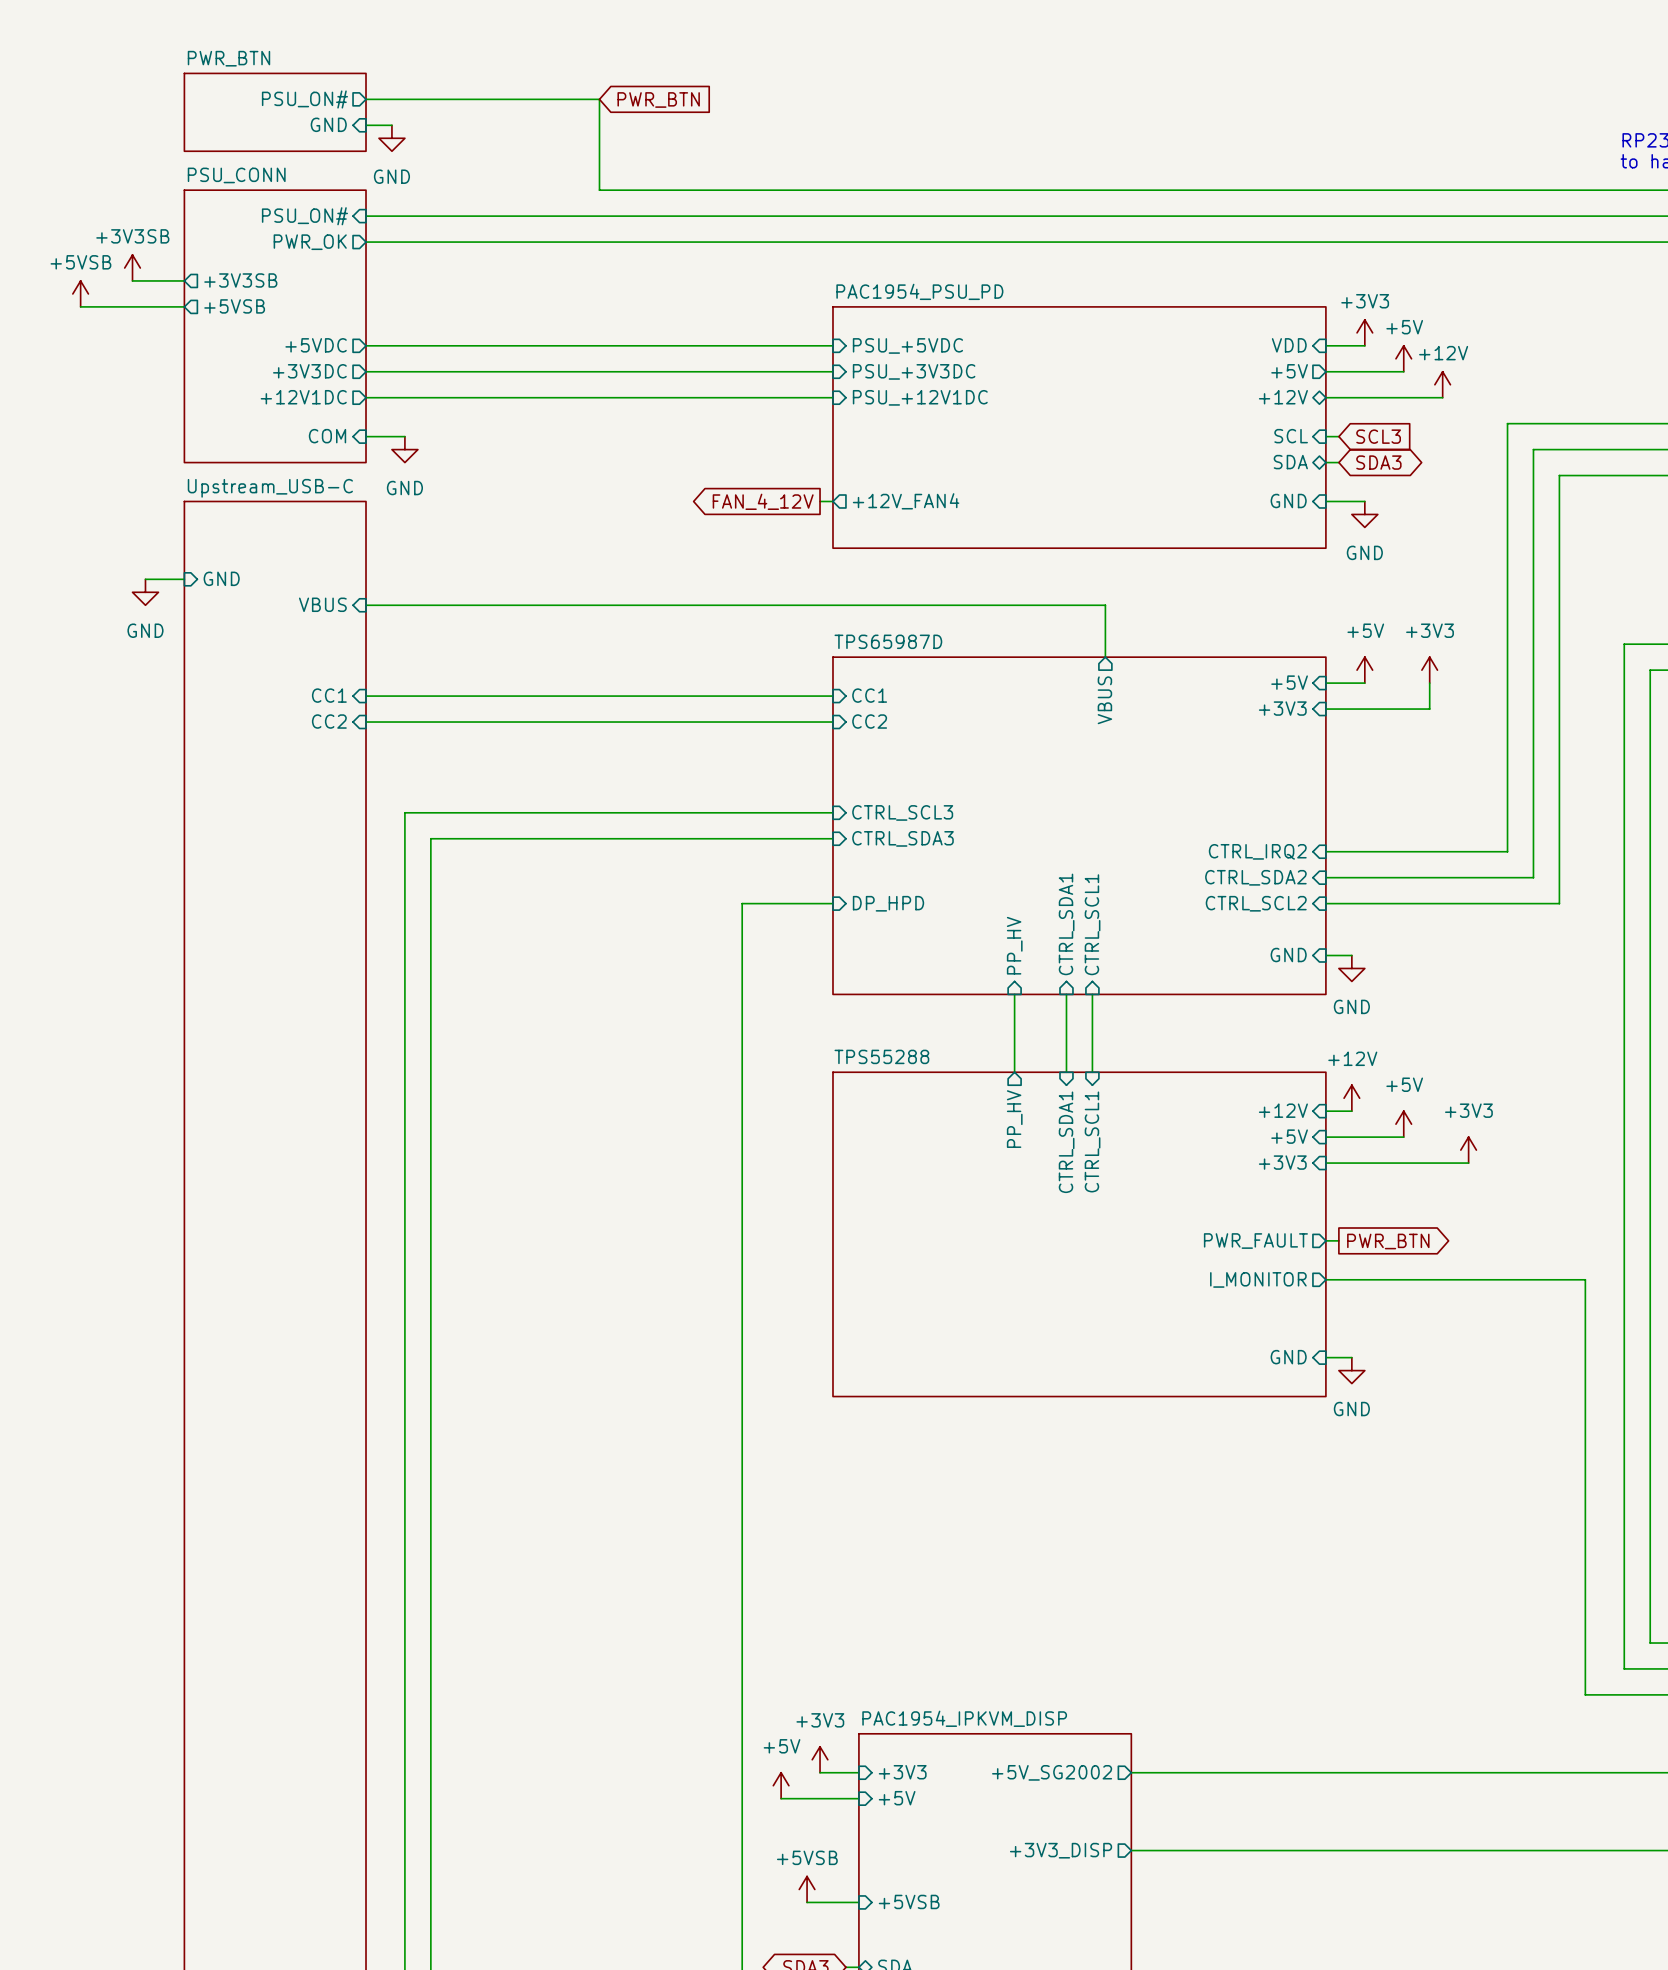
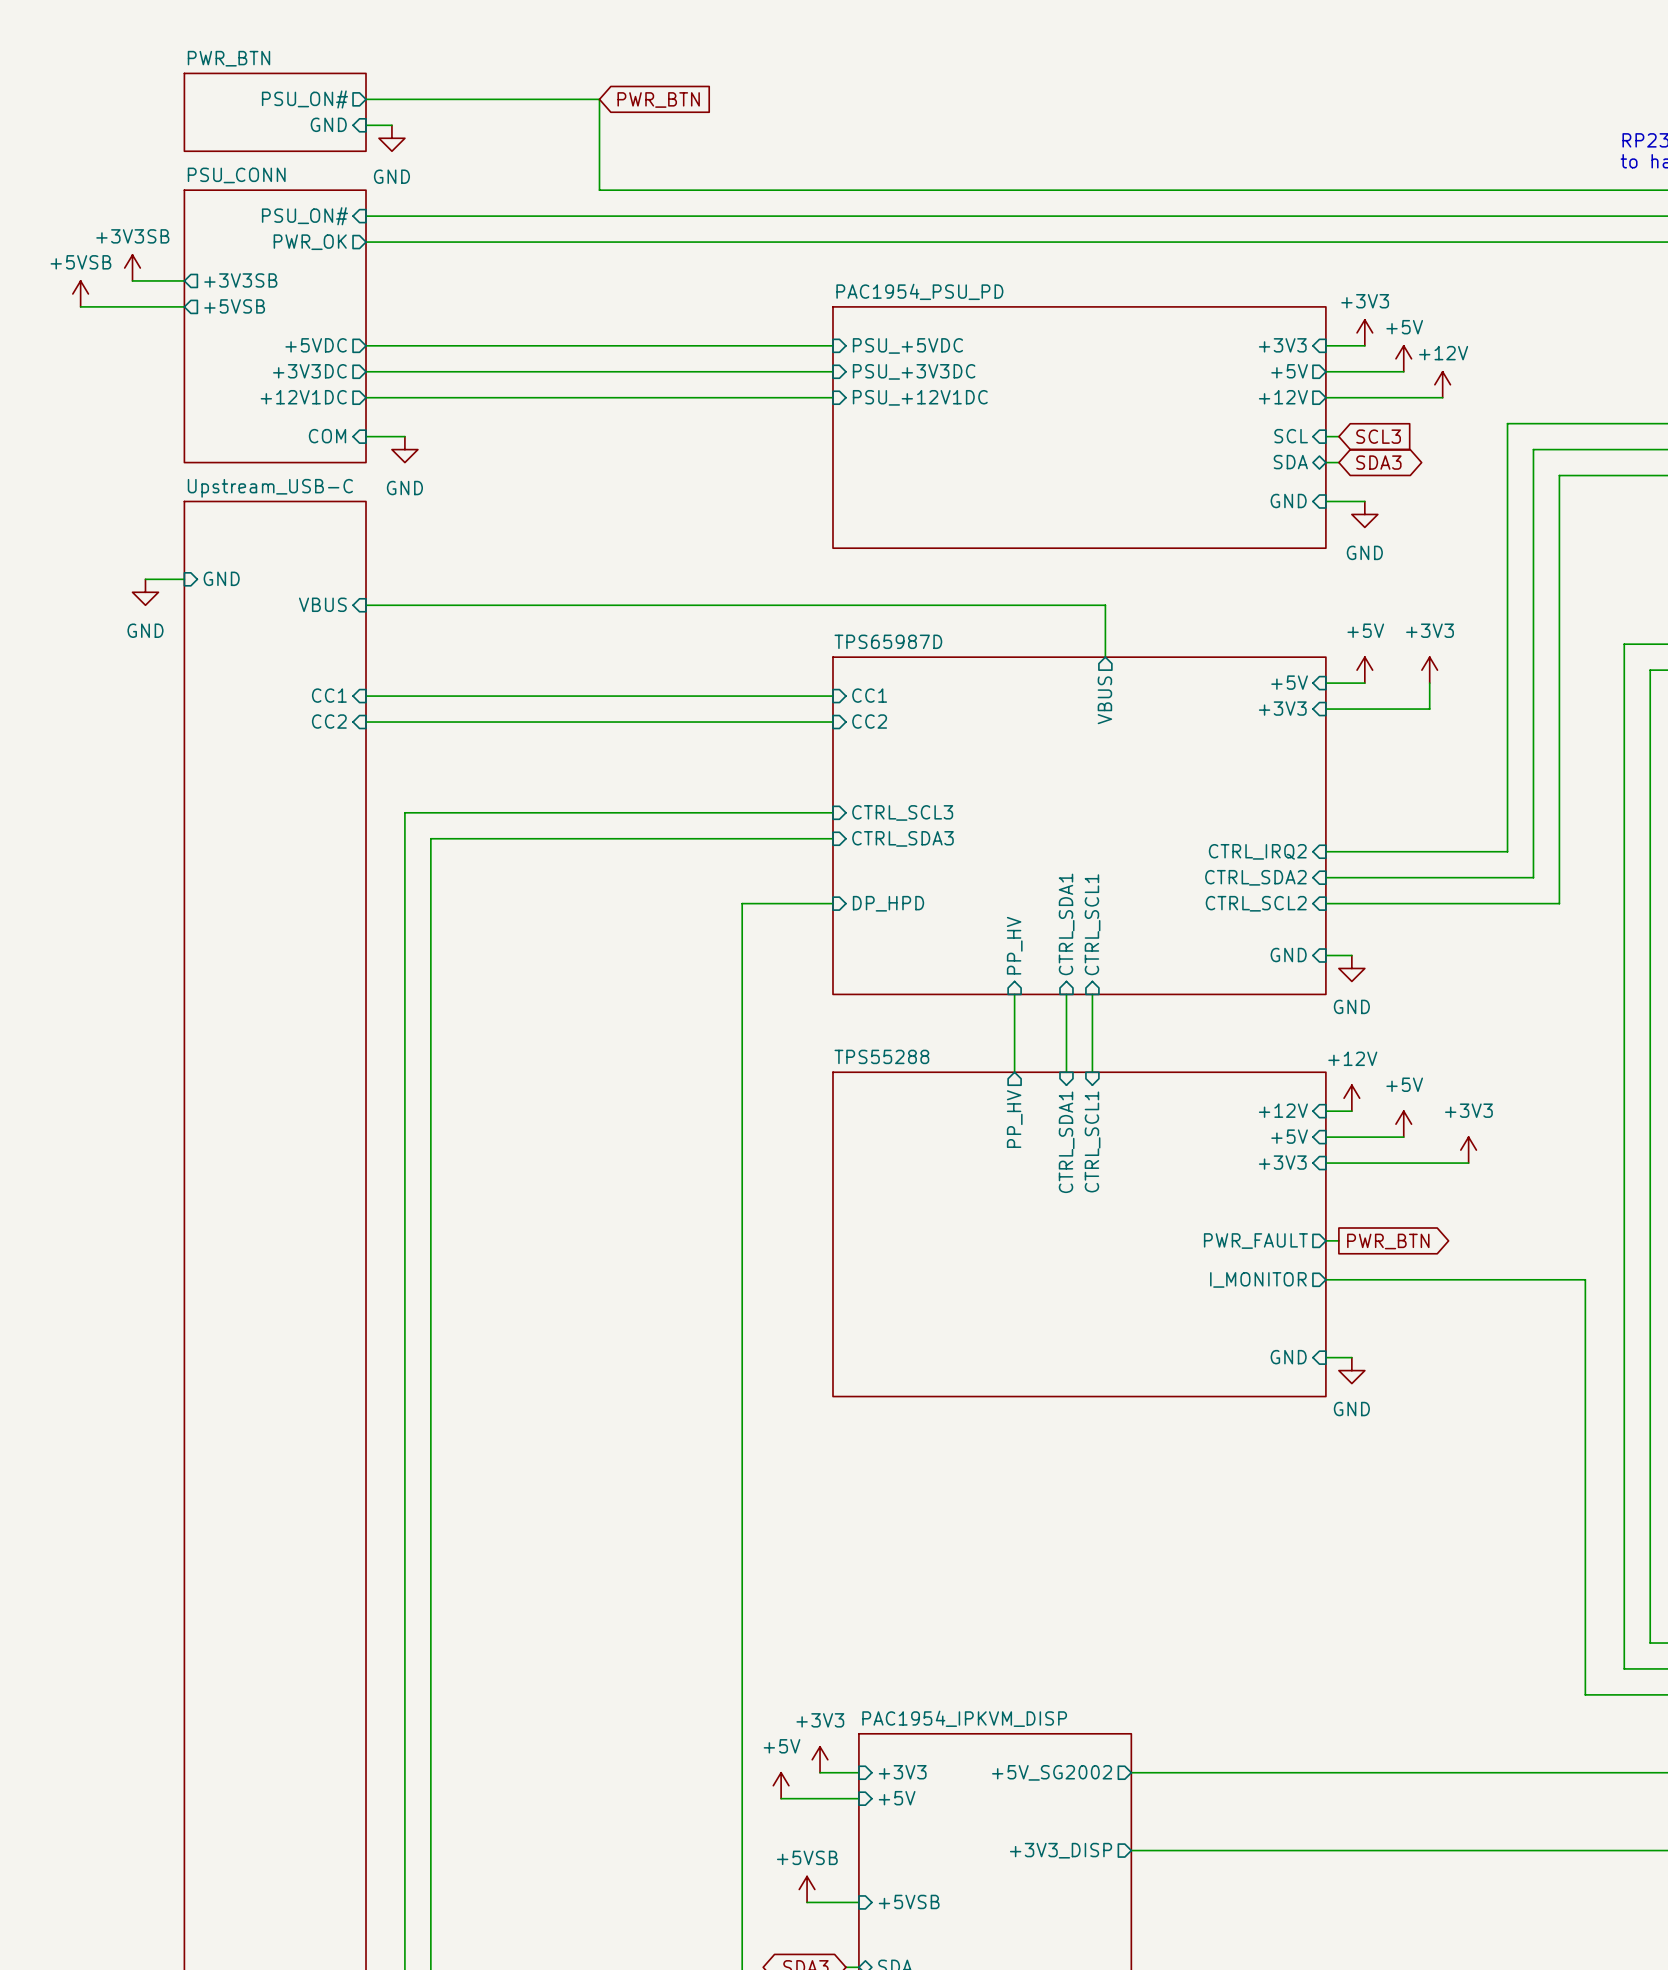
sheet pin: VDD (1289, 345) -> +3V3 (1282, 345)
sheet pin shape: bidirectional (1283, 397) -> output (1283, 397)
global label: FAN_4_12V (763, 501) -> none
wire: (820, 501) (832, 501) -> none
sheet pin: +12V_FAN4 (906, 501) -> none

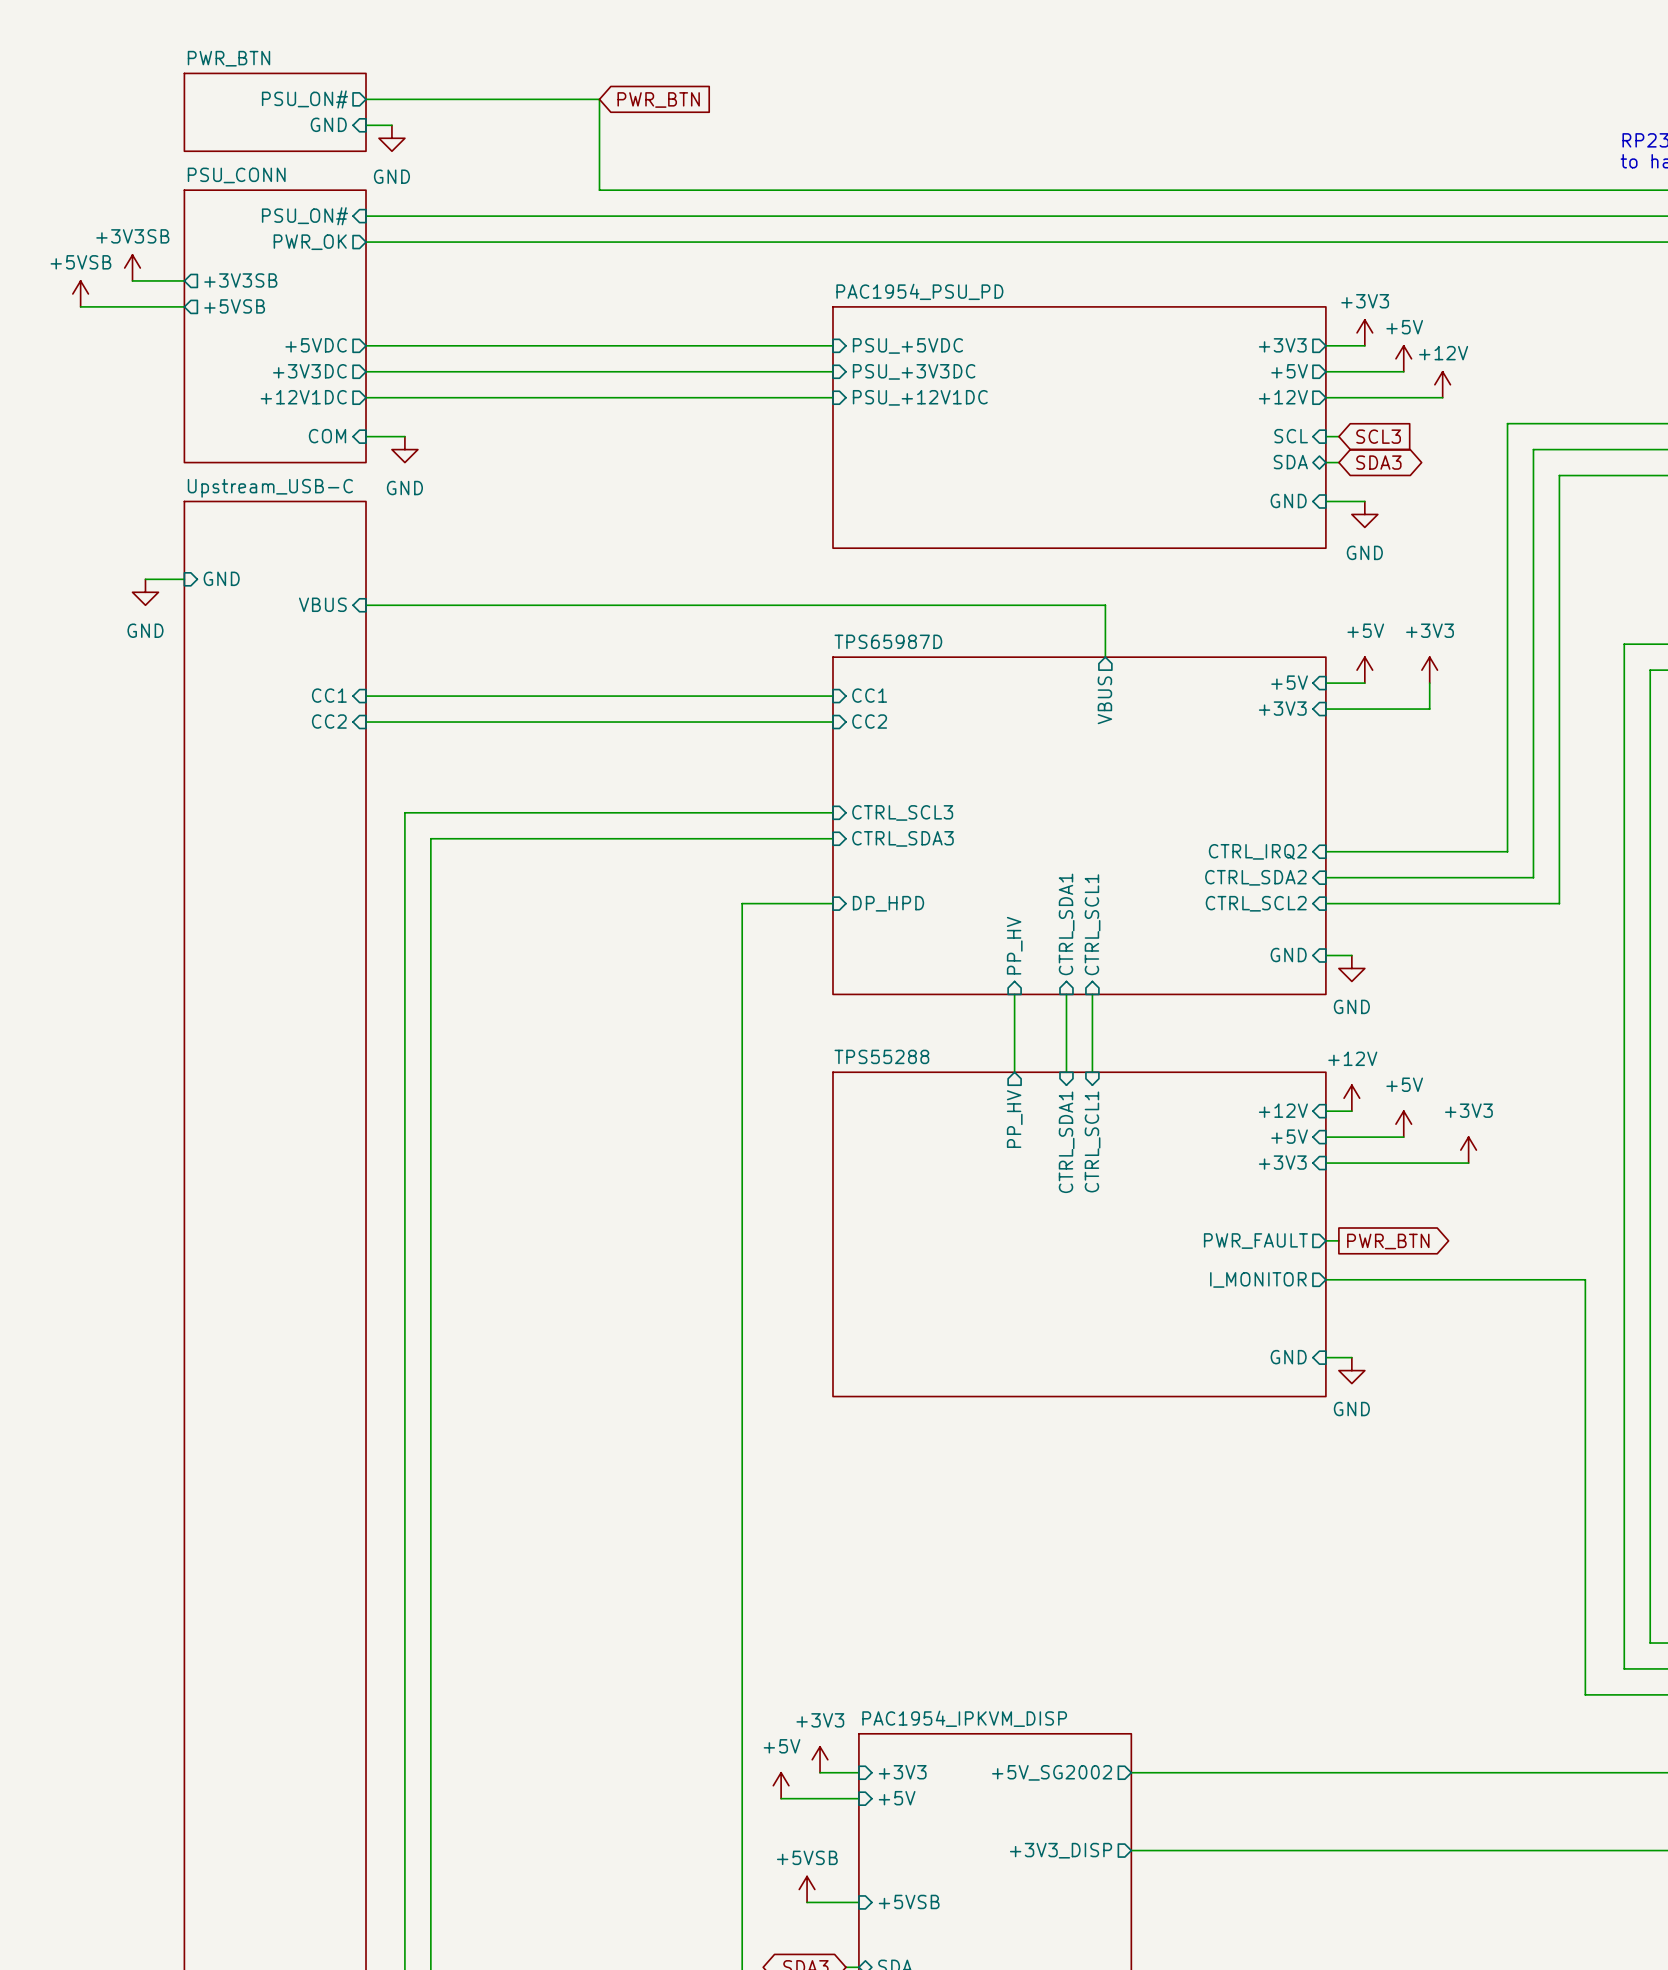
sheet pin shape: input (1282, 345) -> output (1282, 345)

